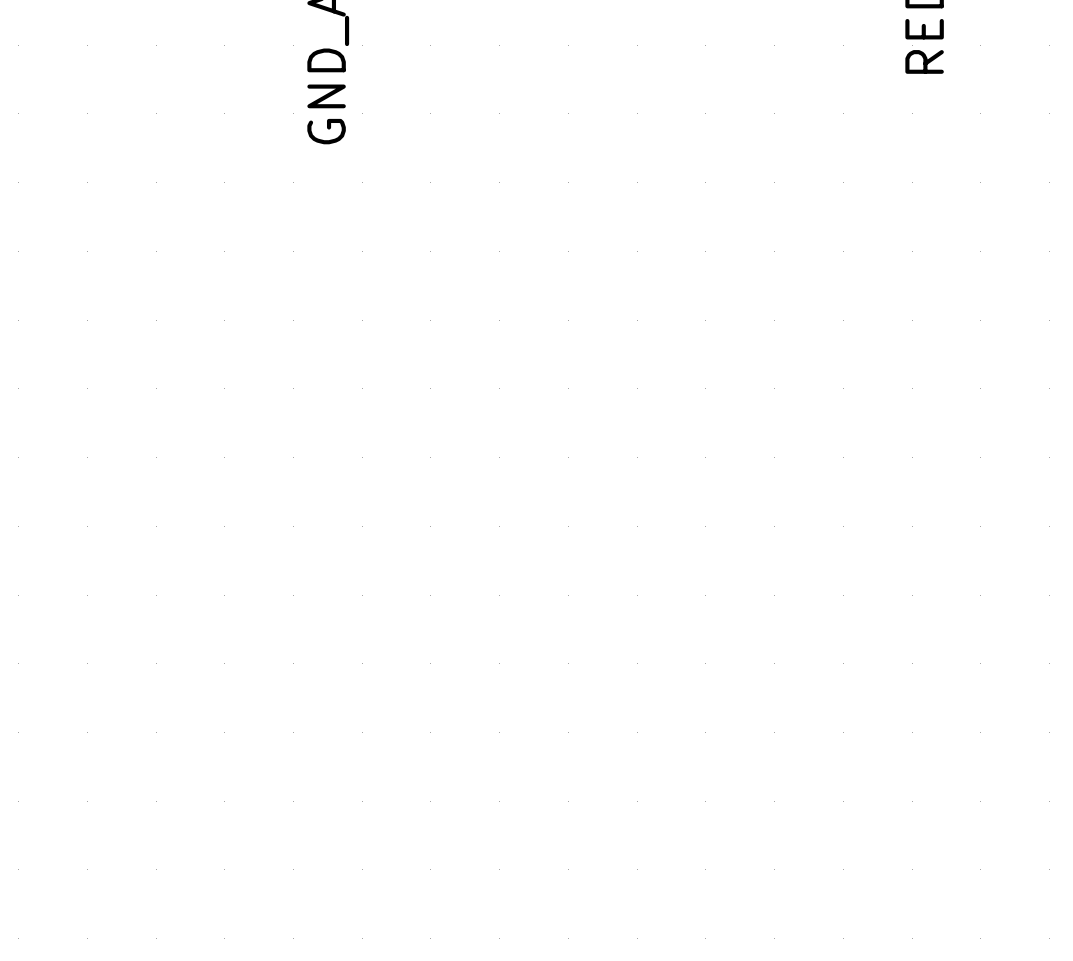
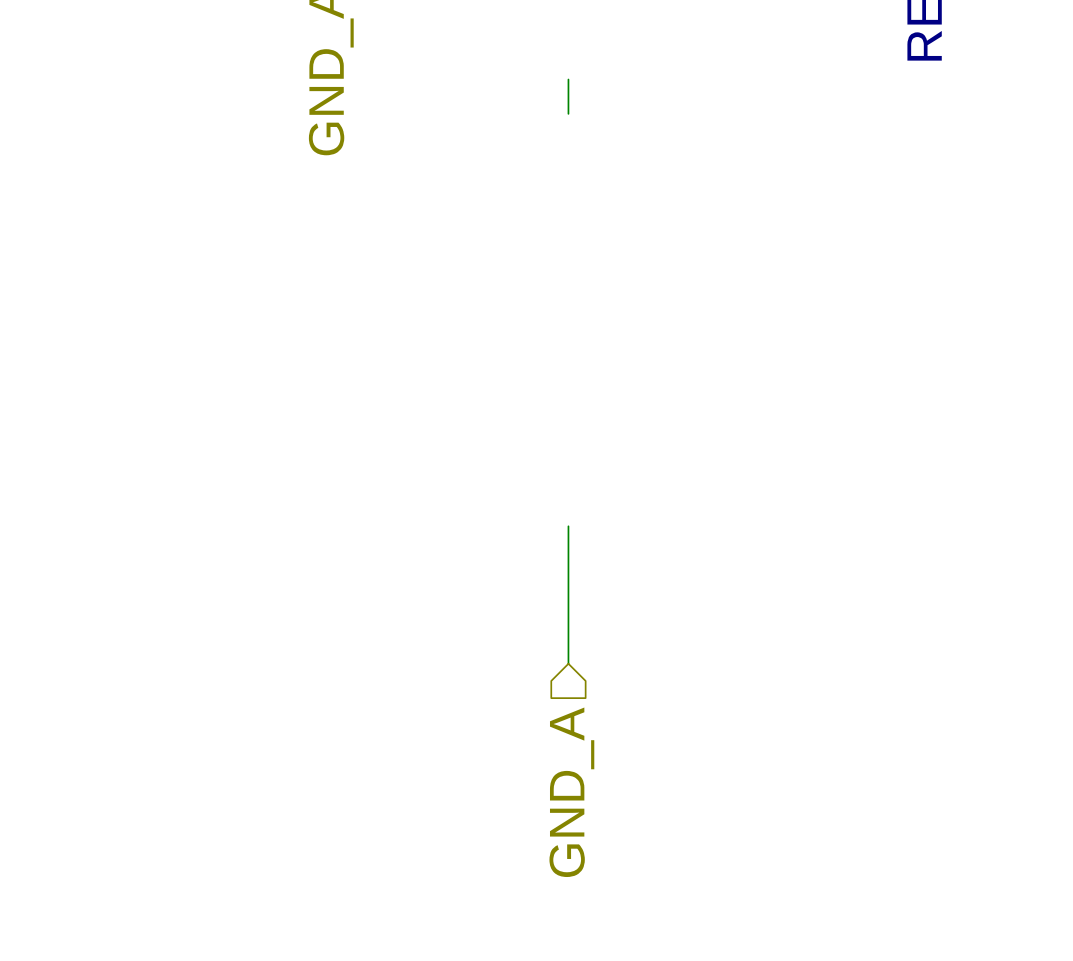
wire: none -> (568, 79) (568, 113)
wire: none -> (568, 526) (568, 663)
hierarchical label: none -> GND_A (571, 792)

